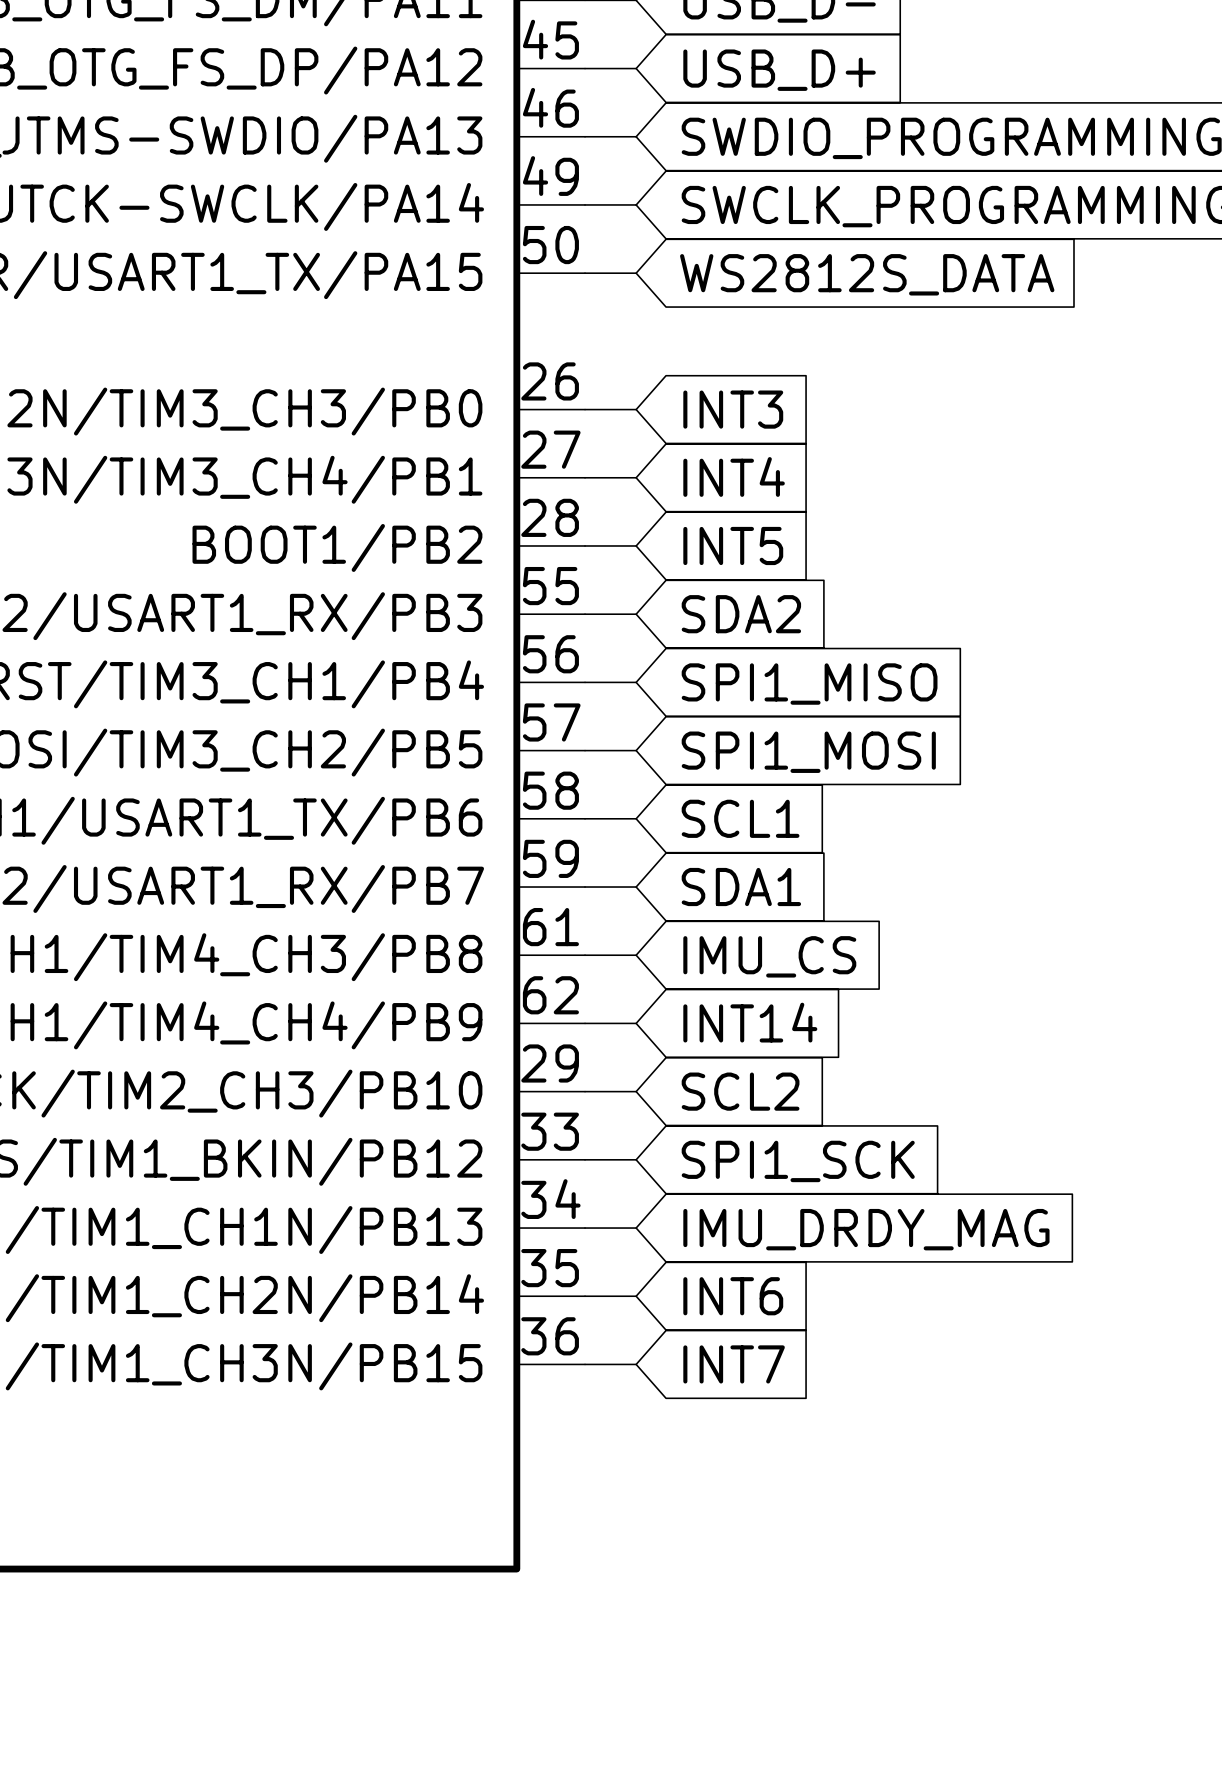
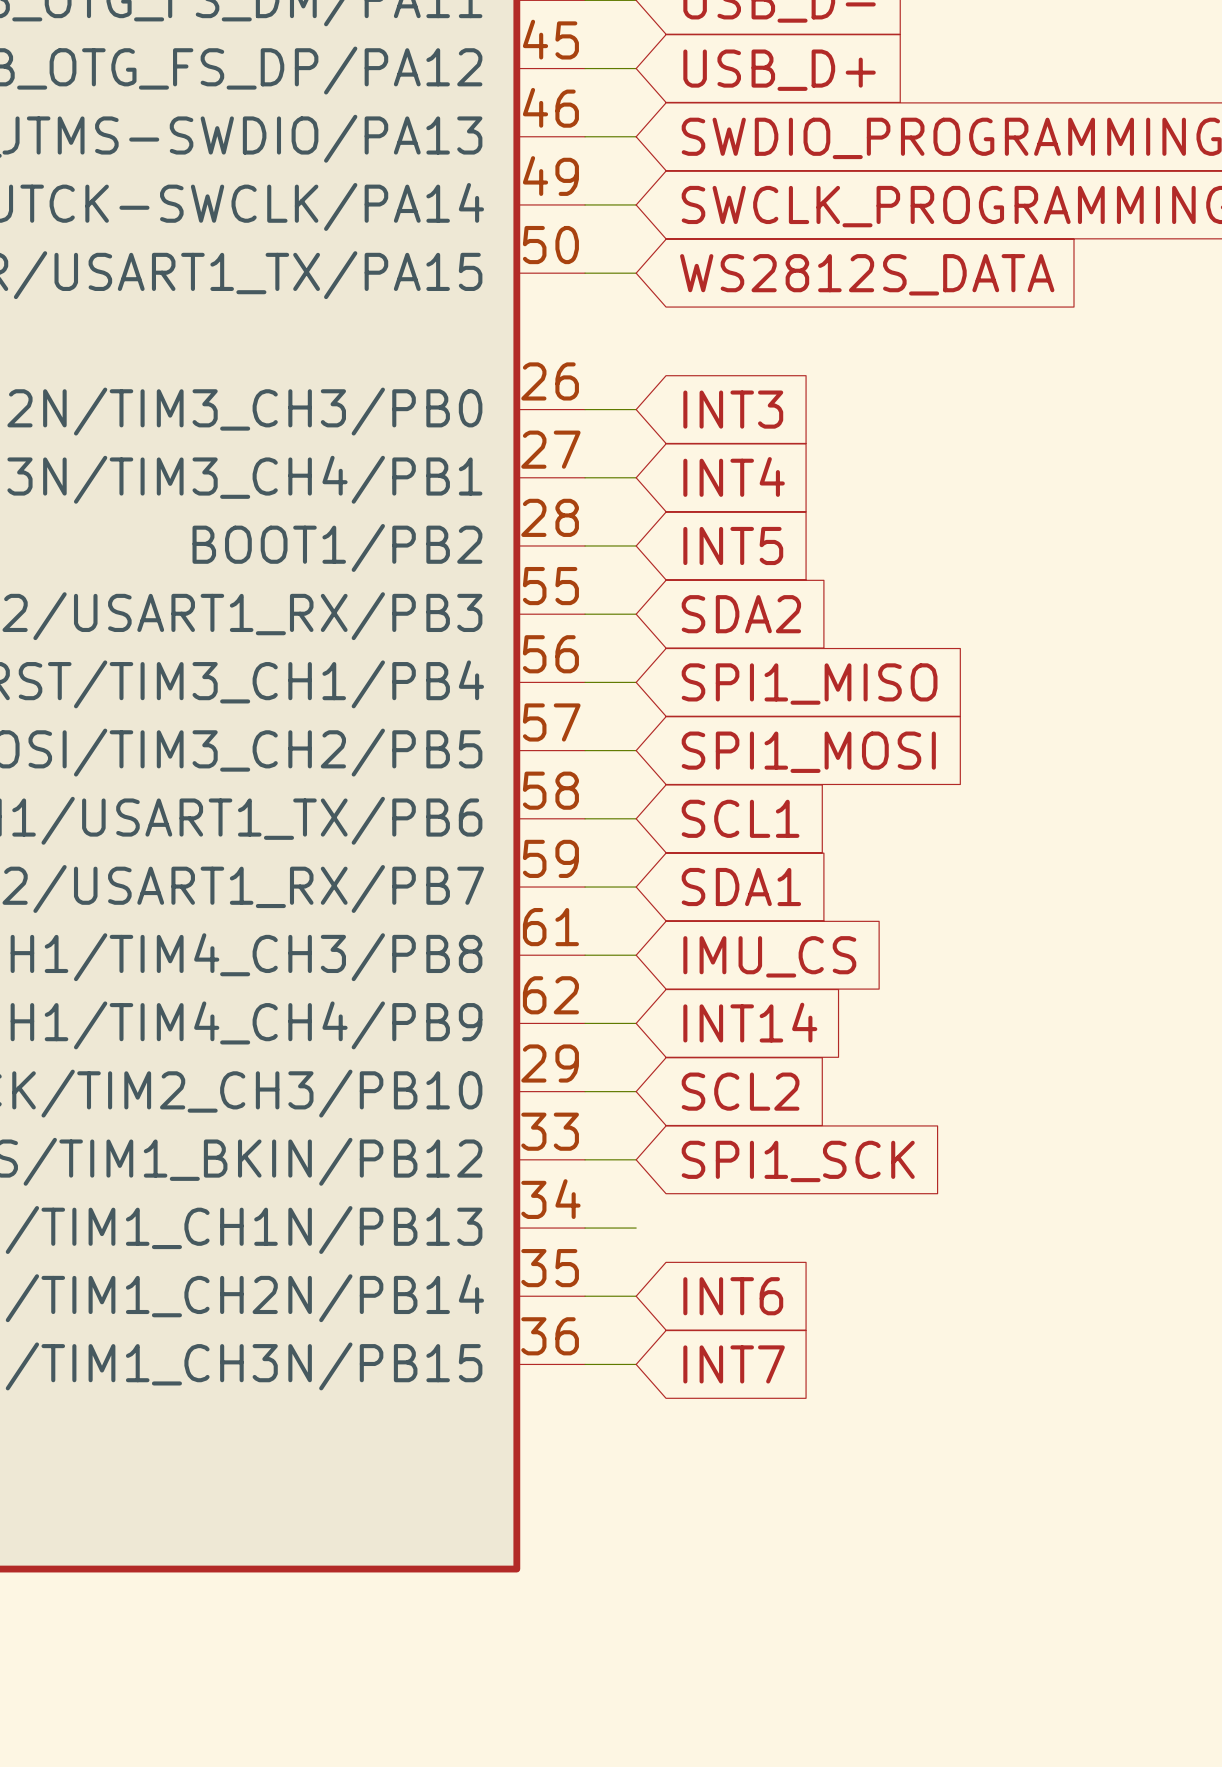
global label: IMU_DRDY_MAG (866, 1229) -> none

